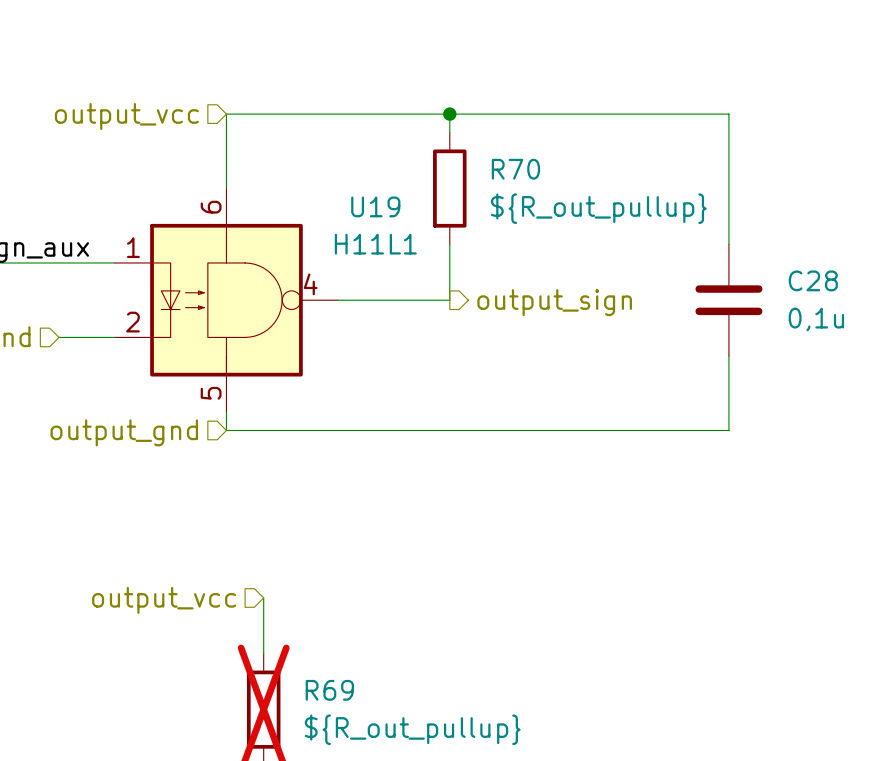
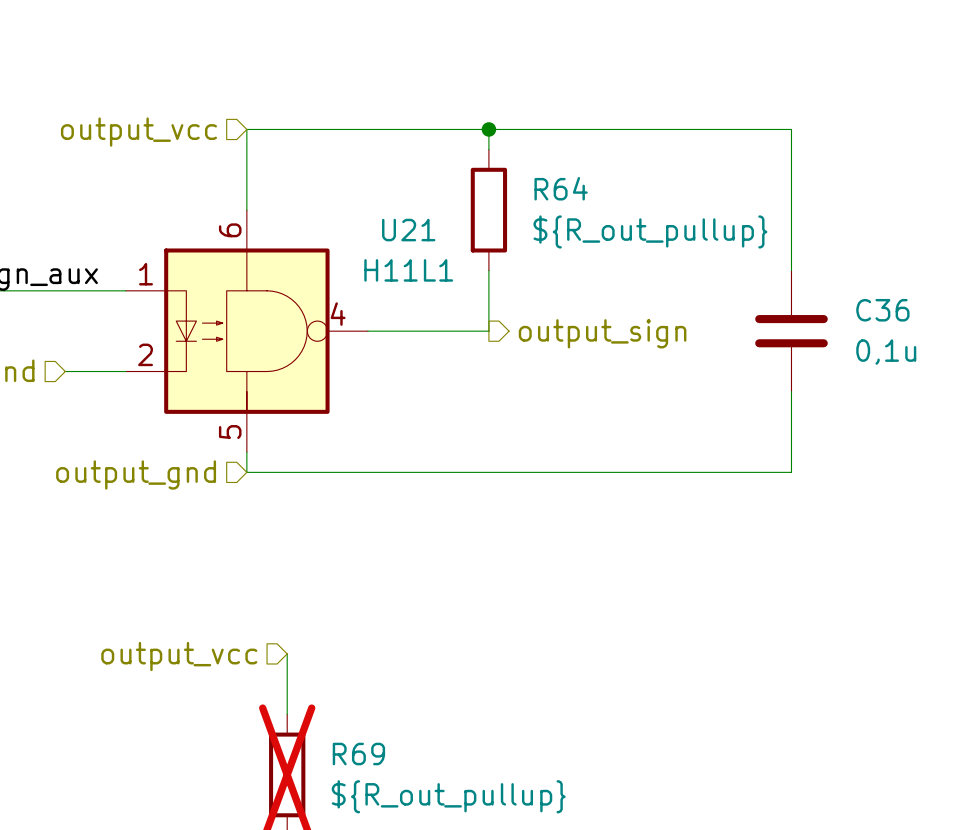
R70 name: R70 (515, 169) -> R64 (561, 188)
U19 name: U19 (375, 206) -> U21 (408, 230)
C28 name: C28 (813, 280) -> C36 (882, 310)

